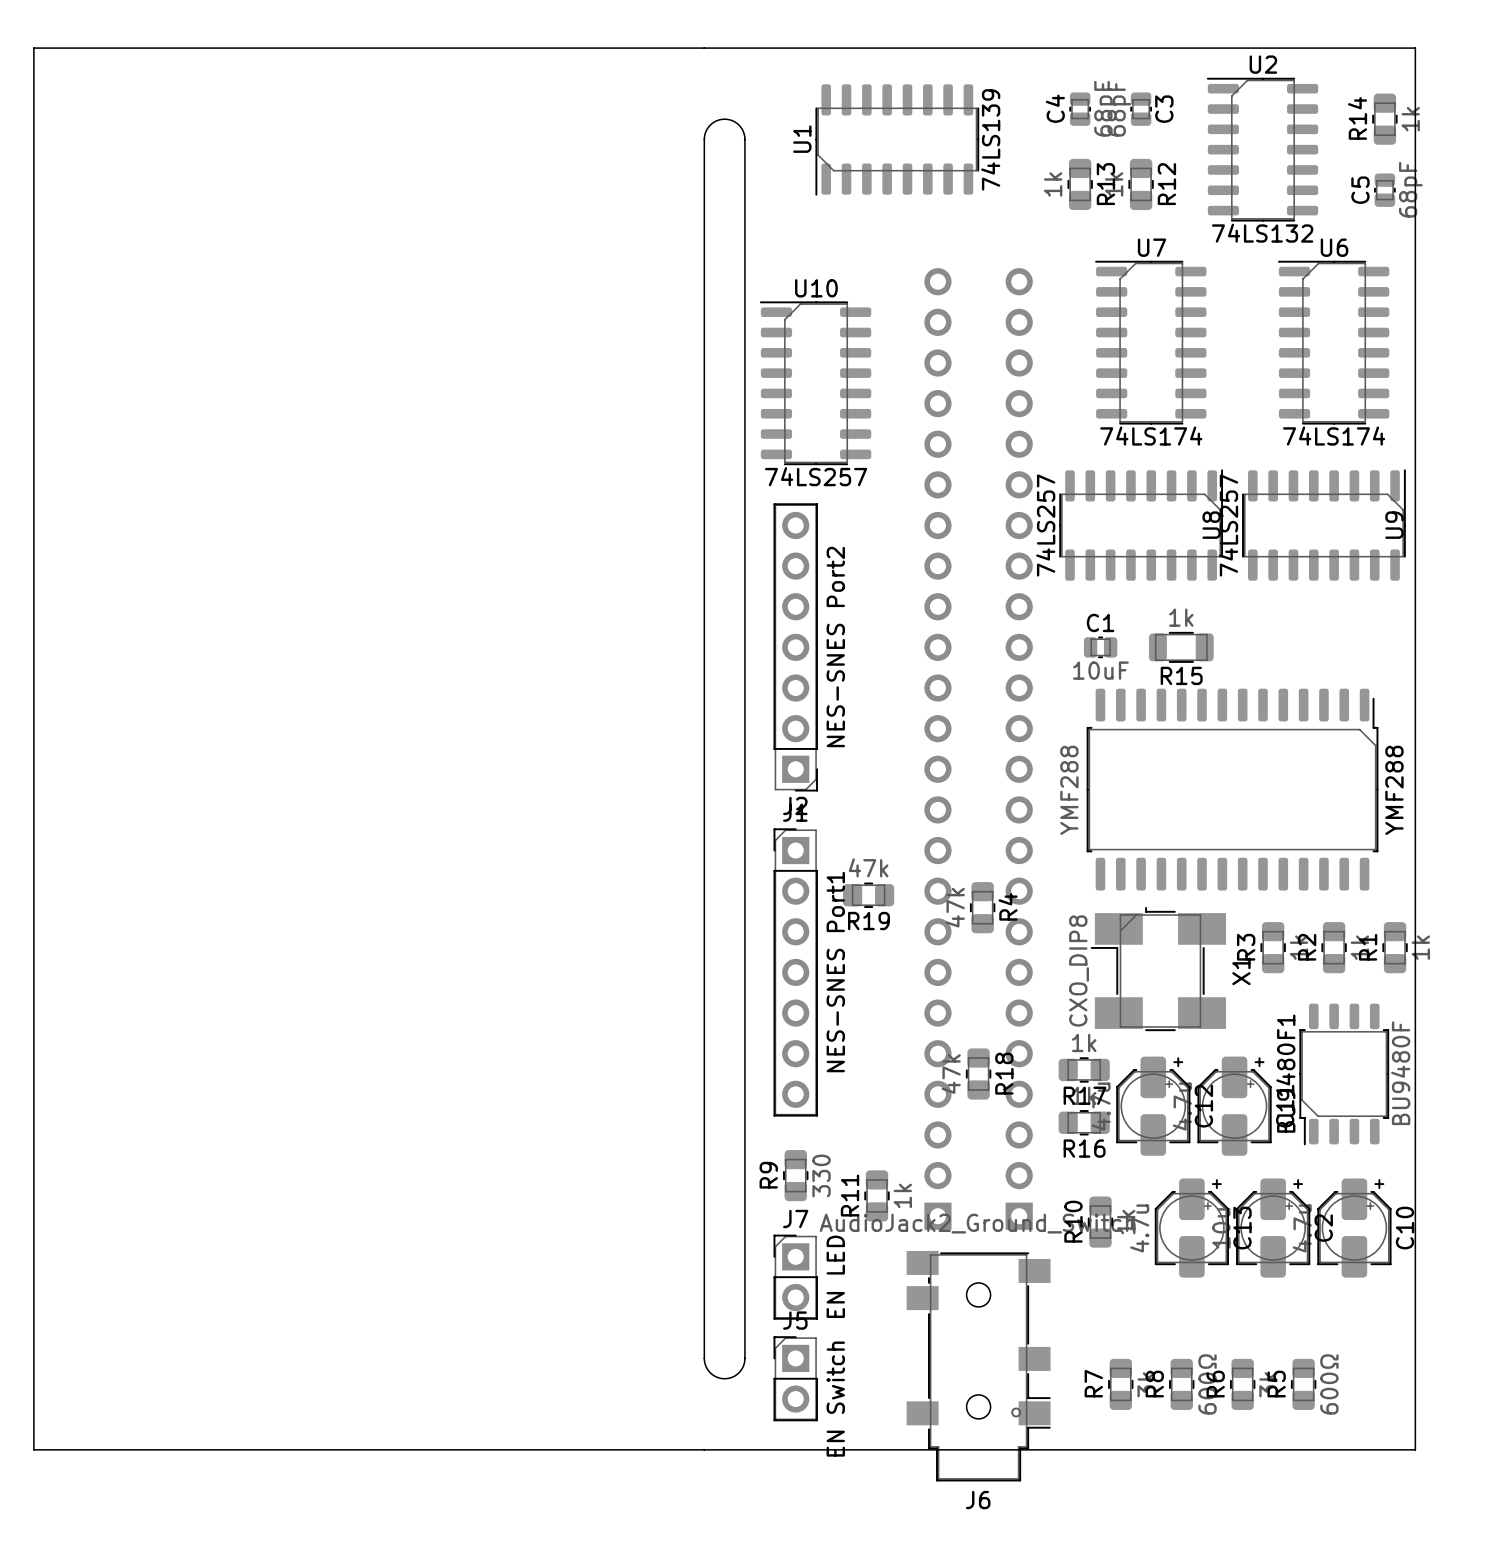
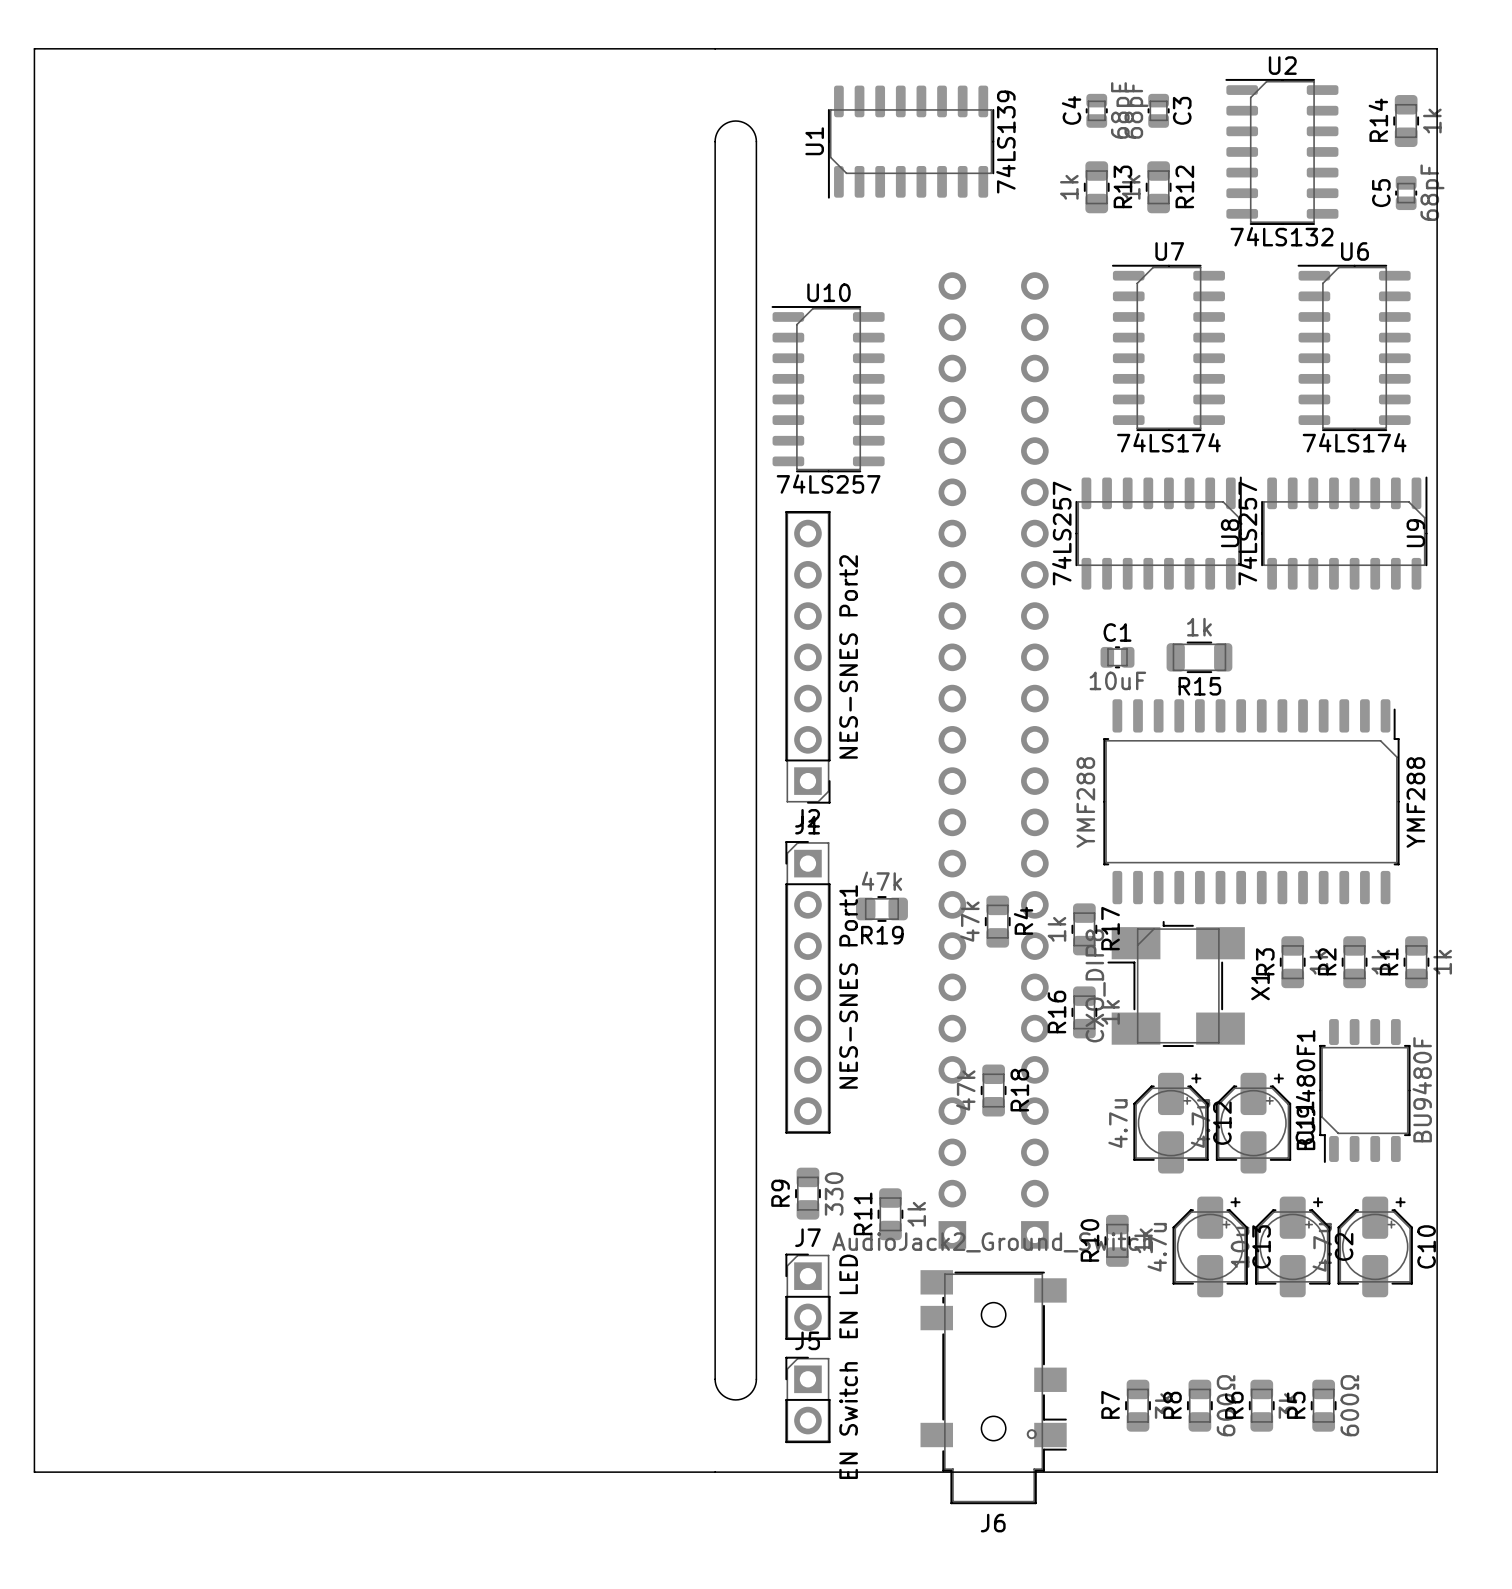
R17 value position: 1k (1084, 1042) -> 1k (1056, 929)
R17 rotation: 0° (1084, 1069) -> 90° clockwise (1084, 929)
R17 position: (1084, 1069) -> (1084, 929)
R17 name position: R17 (1084, 1095) -> R17 (1110, 928)
R16 rotation: 0° (1084, 1122) -> 90° clockwise (1084, 1012)
R16 position: (1084, 1122) -> (1084, 1012)

